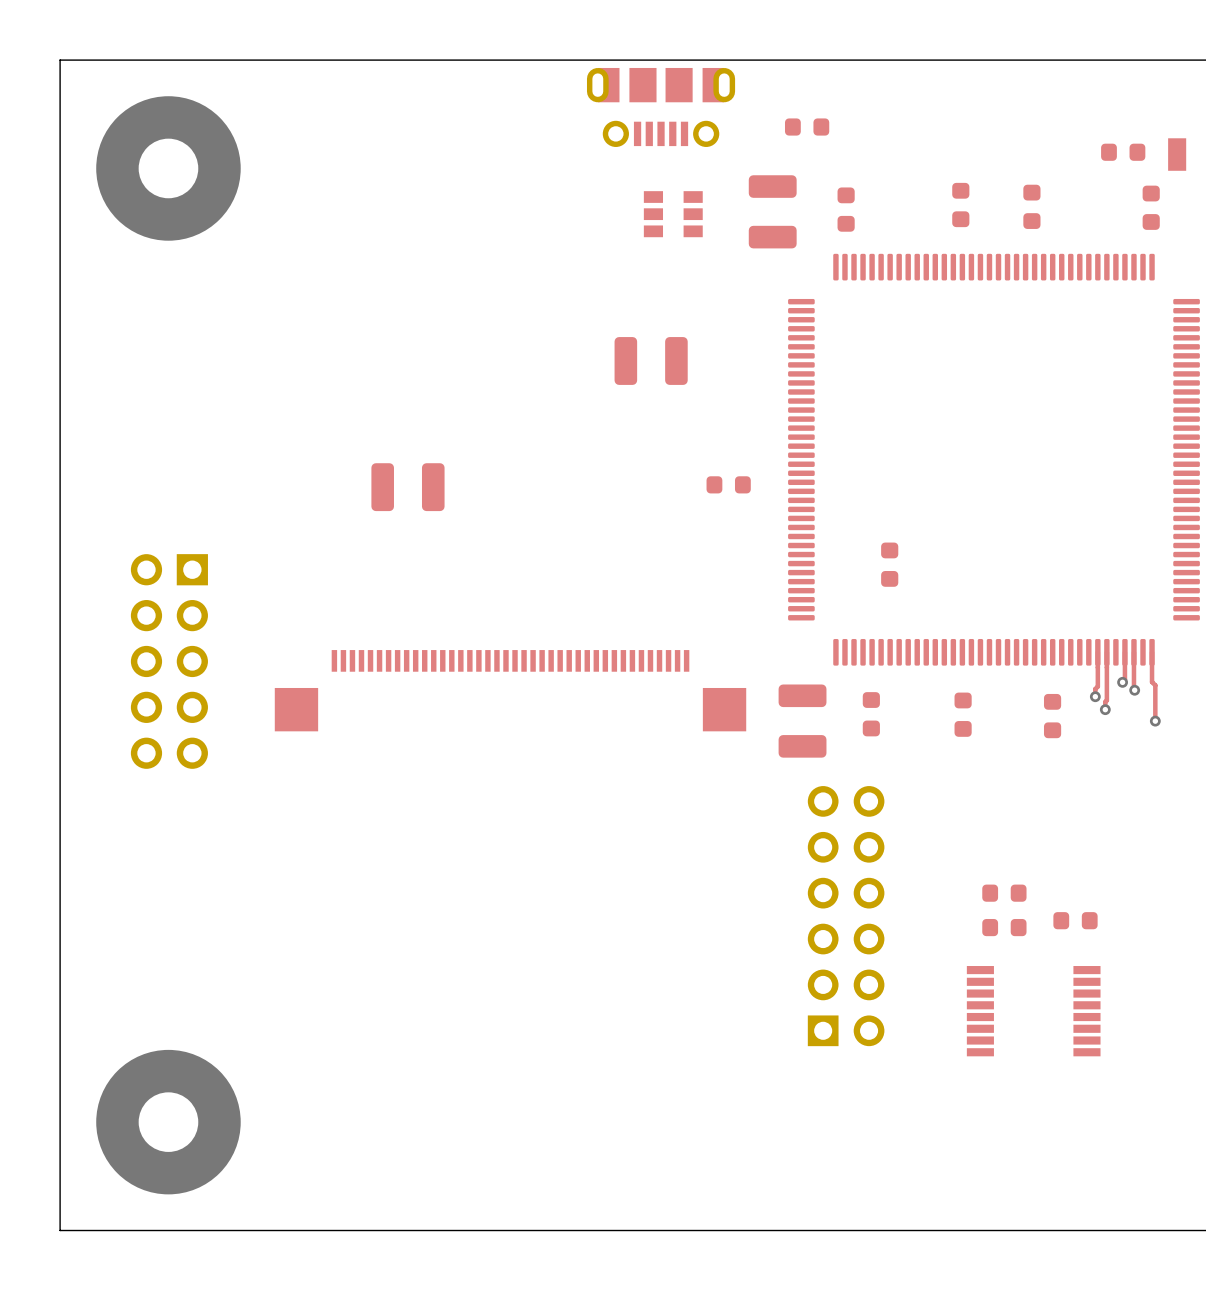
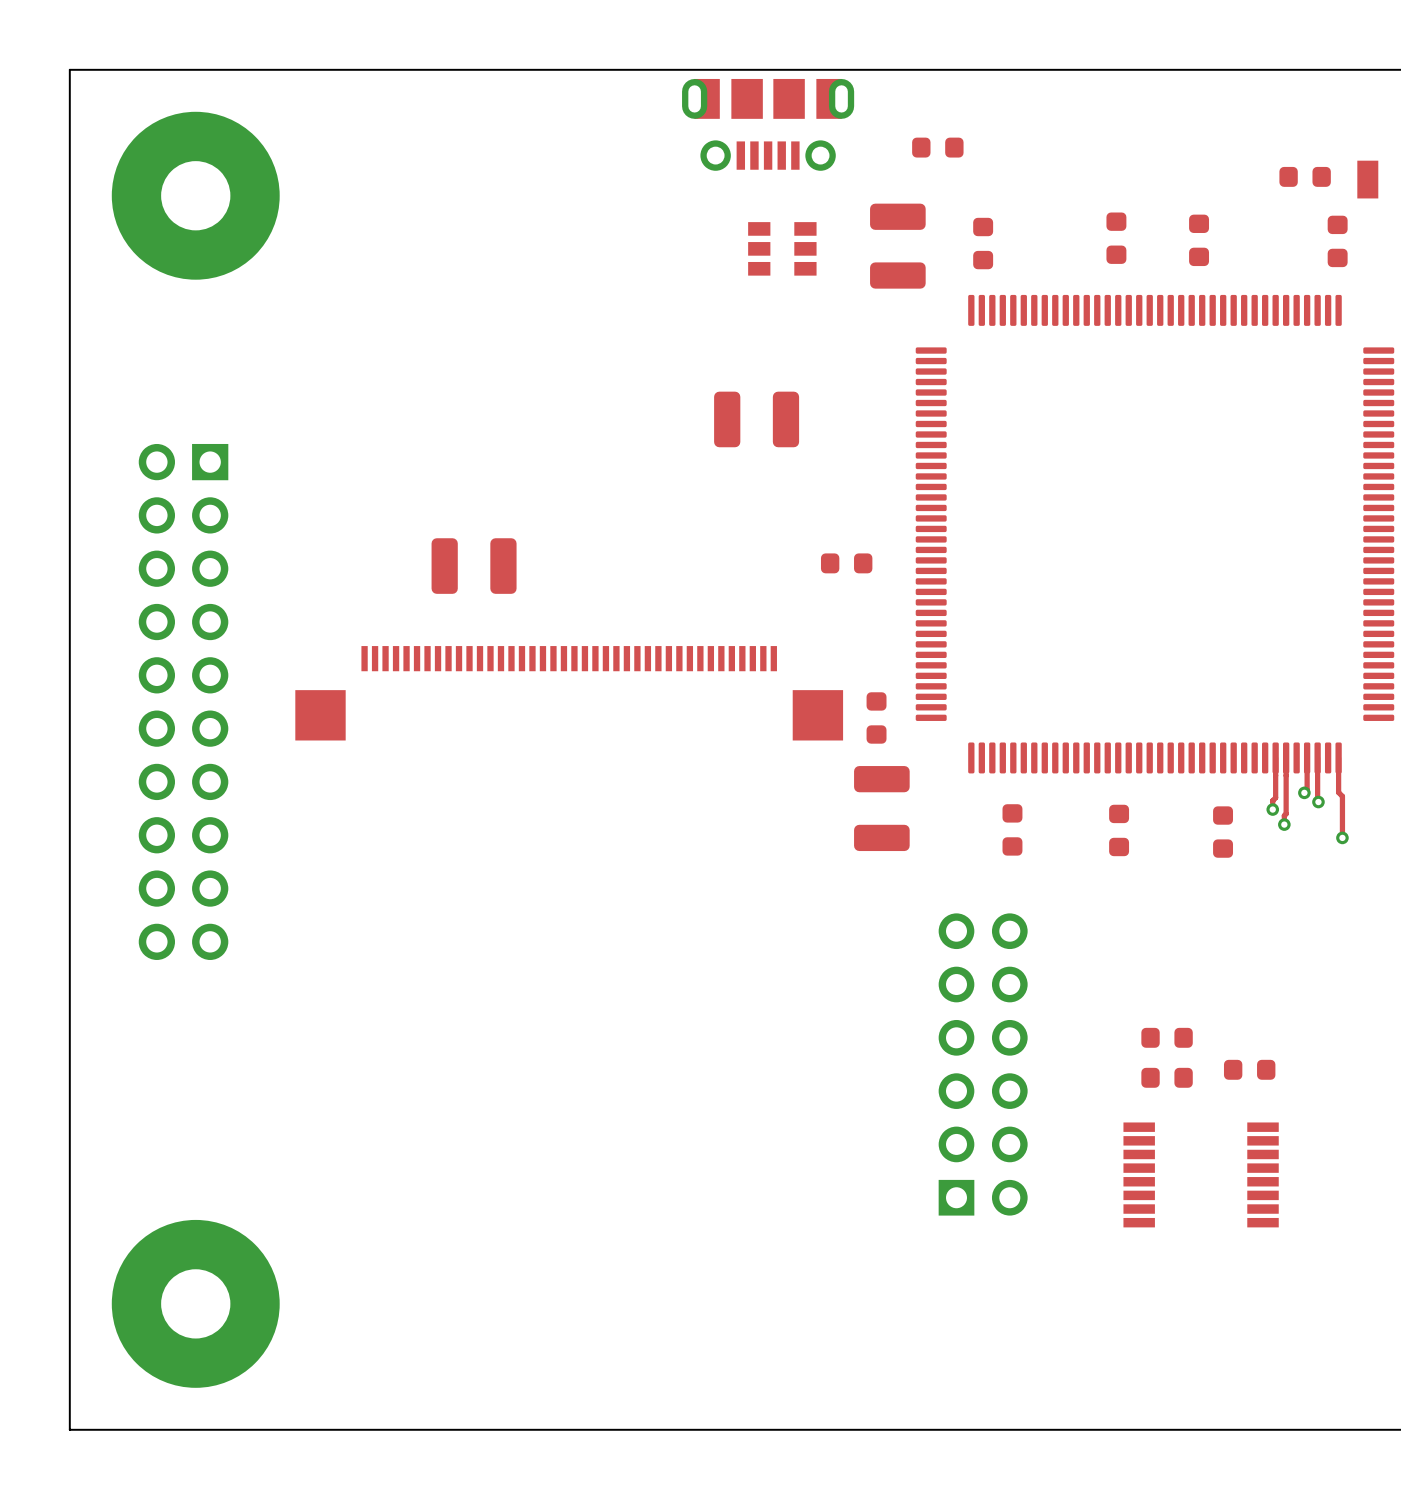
part position: (889, 564) -> (876, 717)
part: none -> (183, 701)
part: (169, 661) -> none
part position: (510, 690) -> (569, 693)
part position: (802, 721) -> (881, 808)

